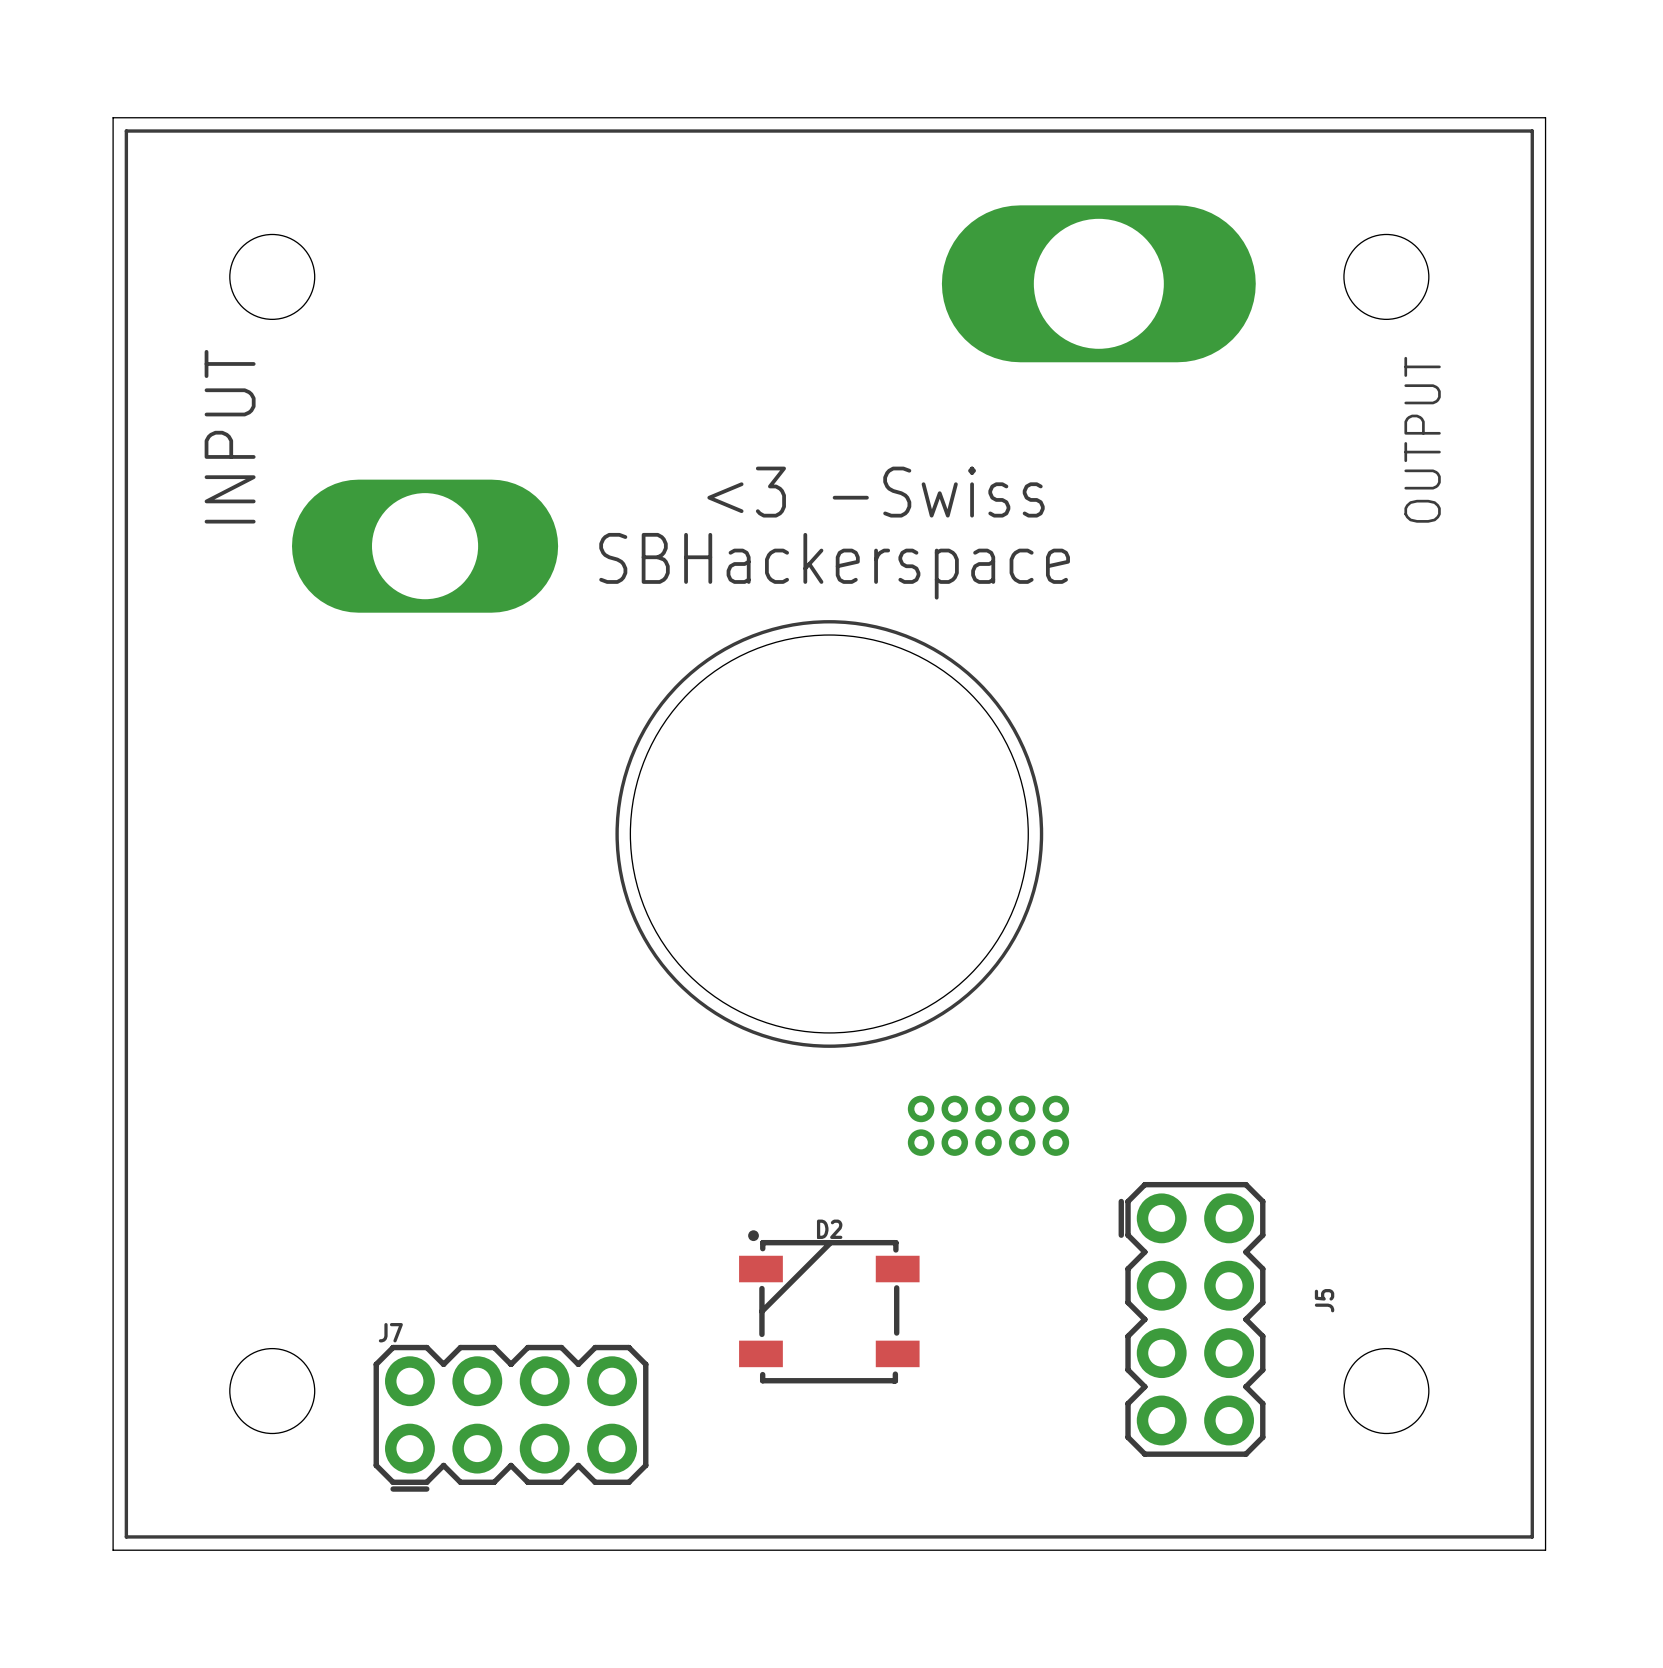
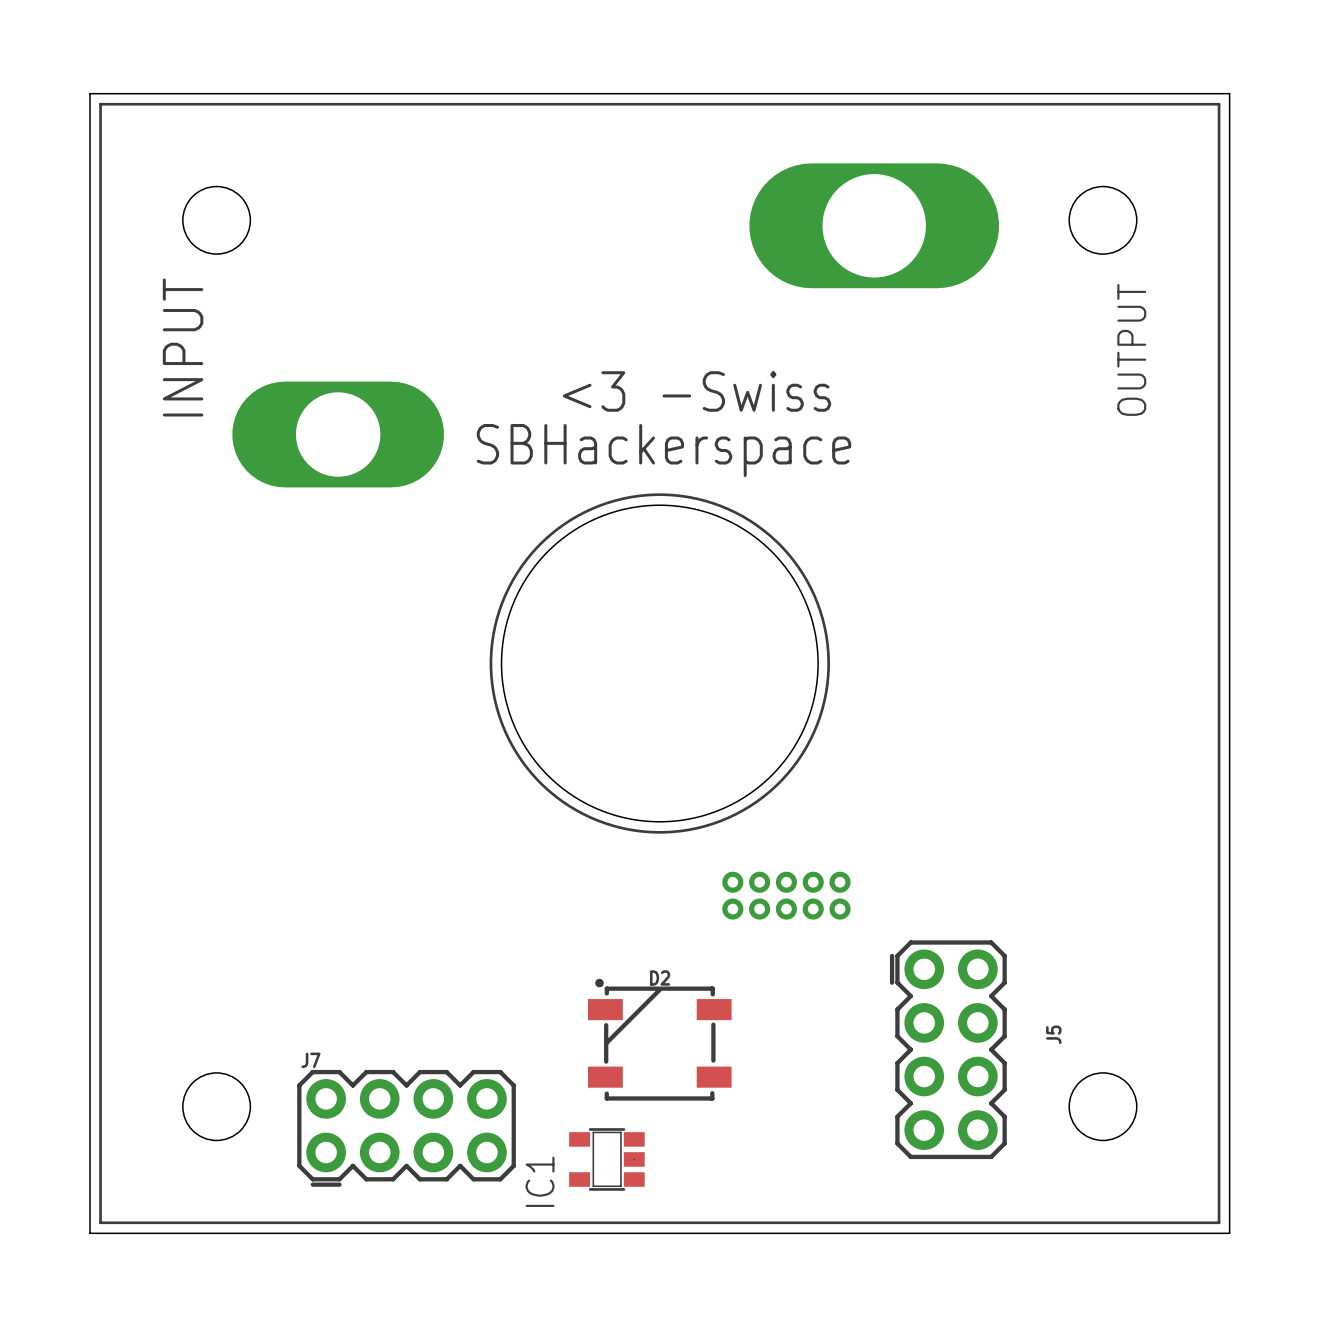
IC1: none -> (606, 1159)

